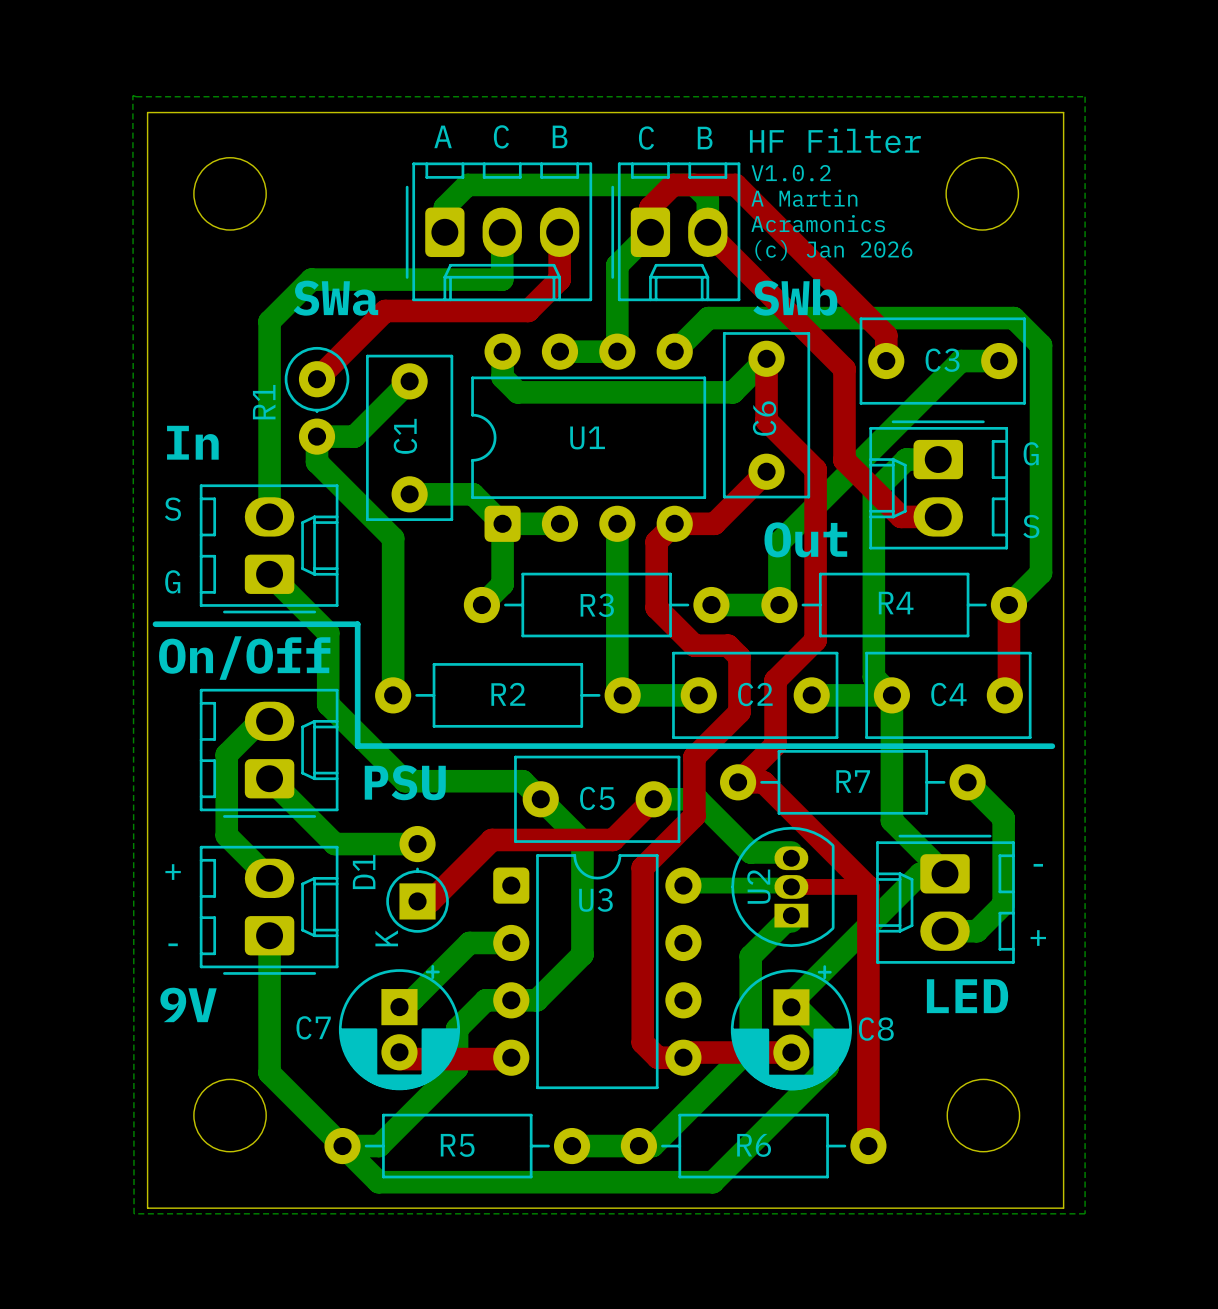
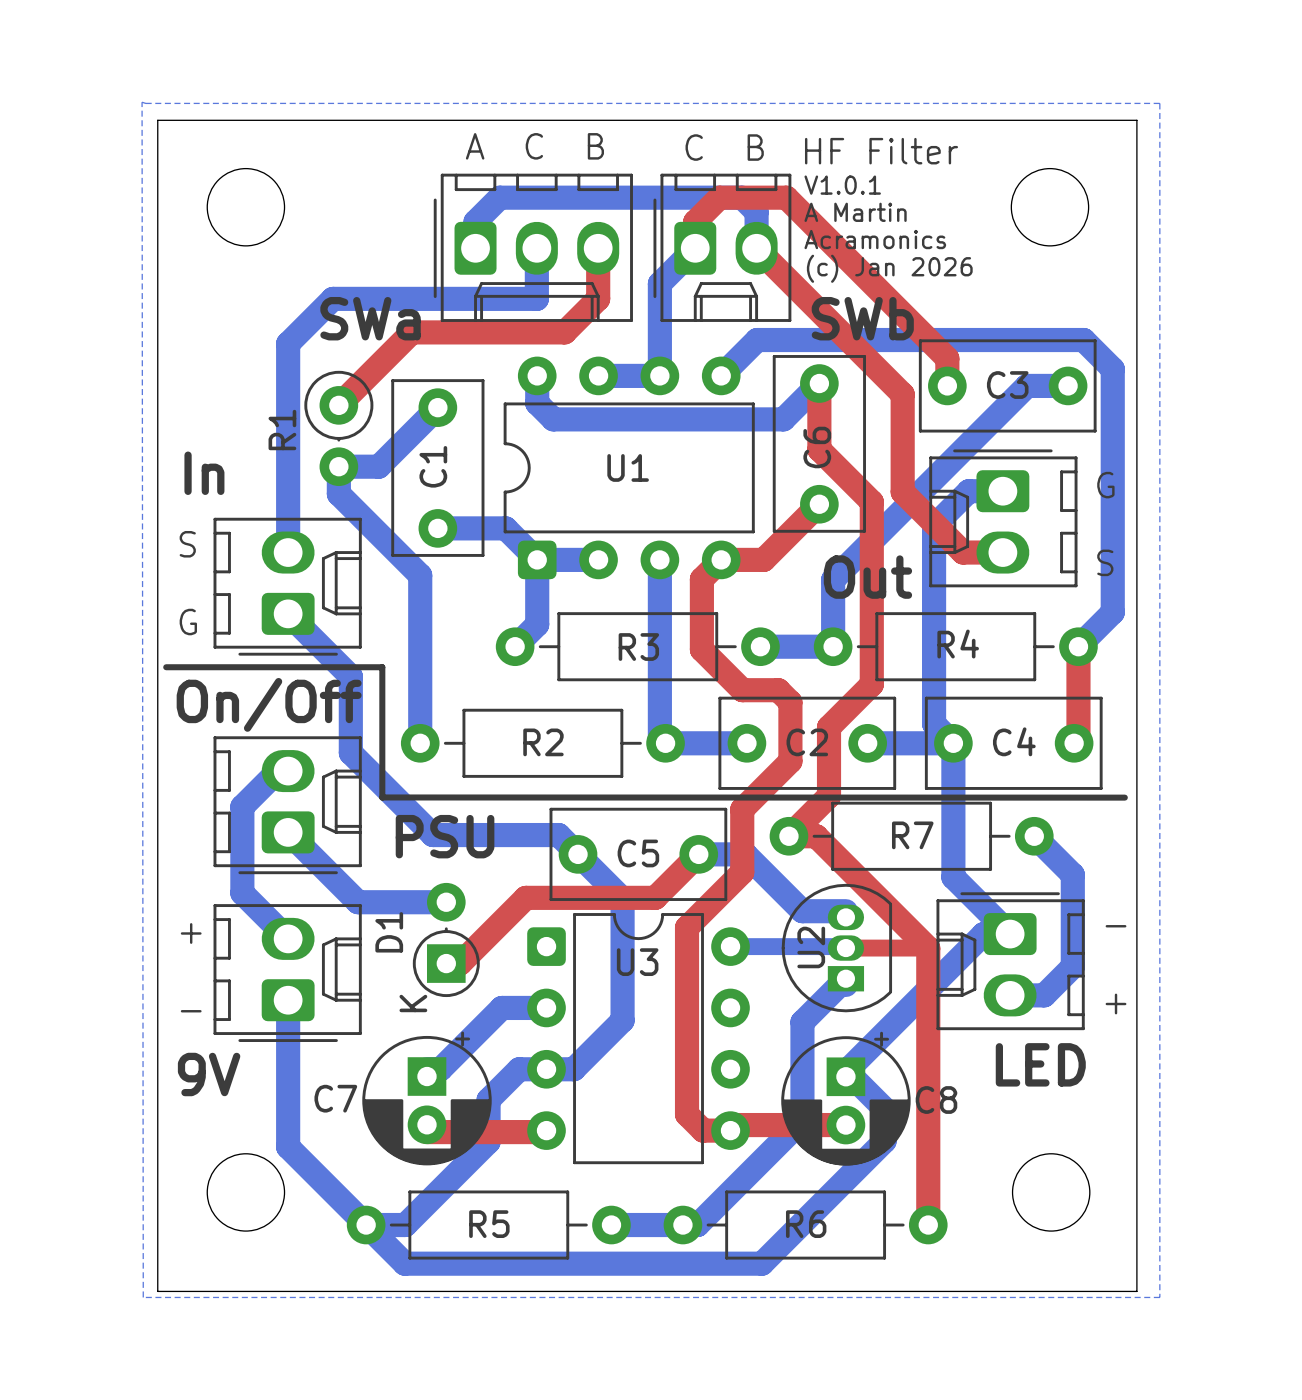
text: V1.0.2 (791, 173) -> V1.0.1 (842, 185)

